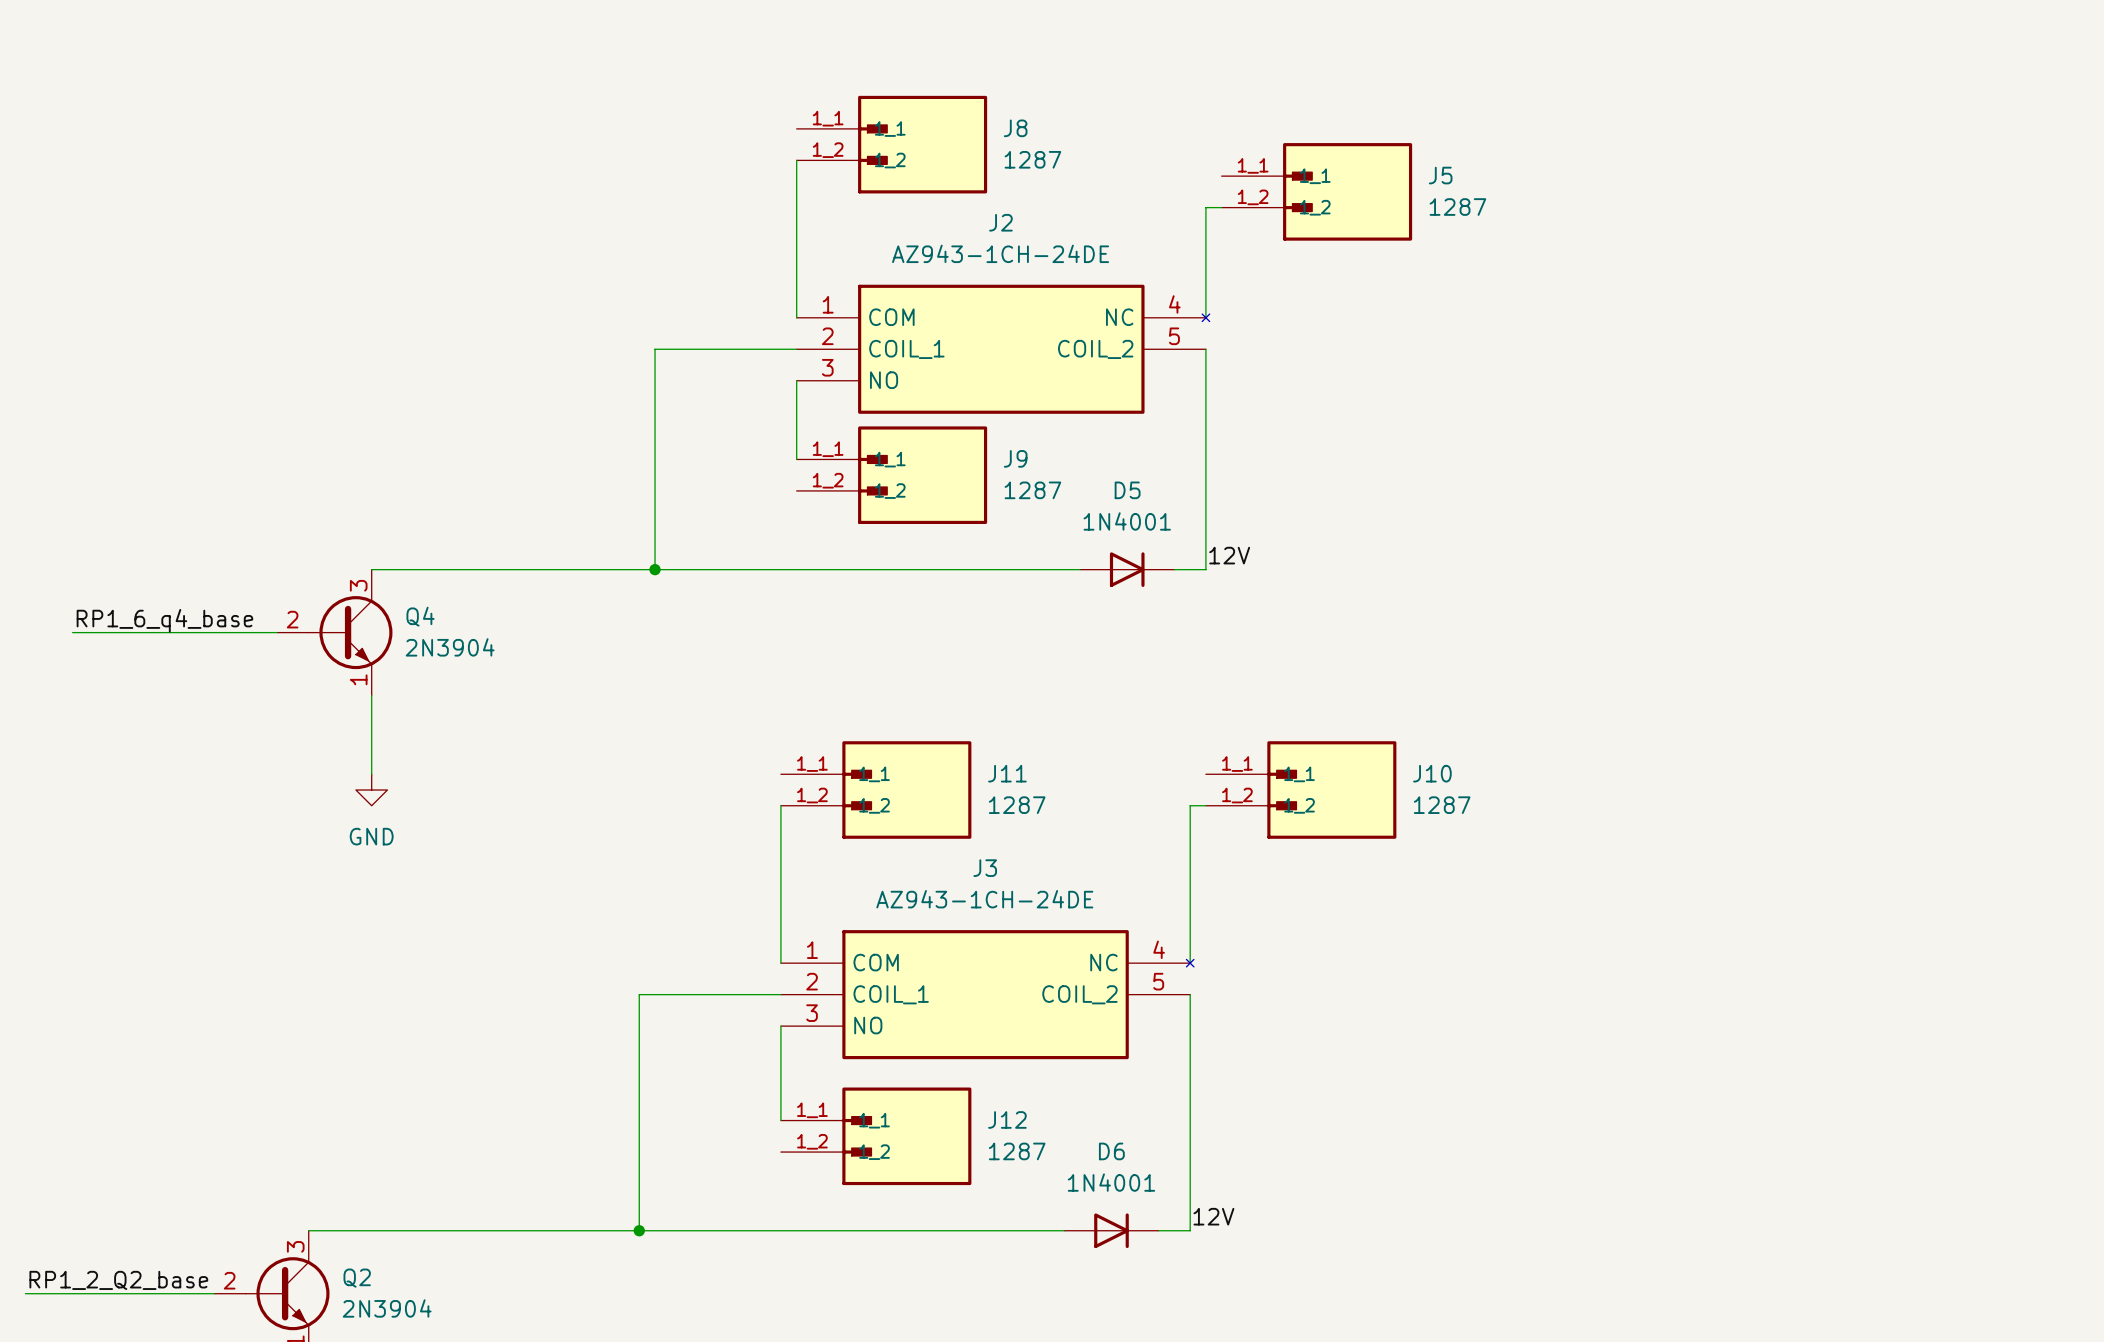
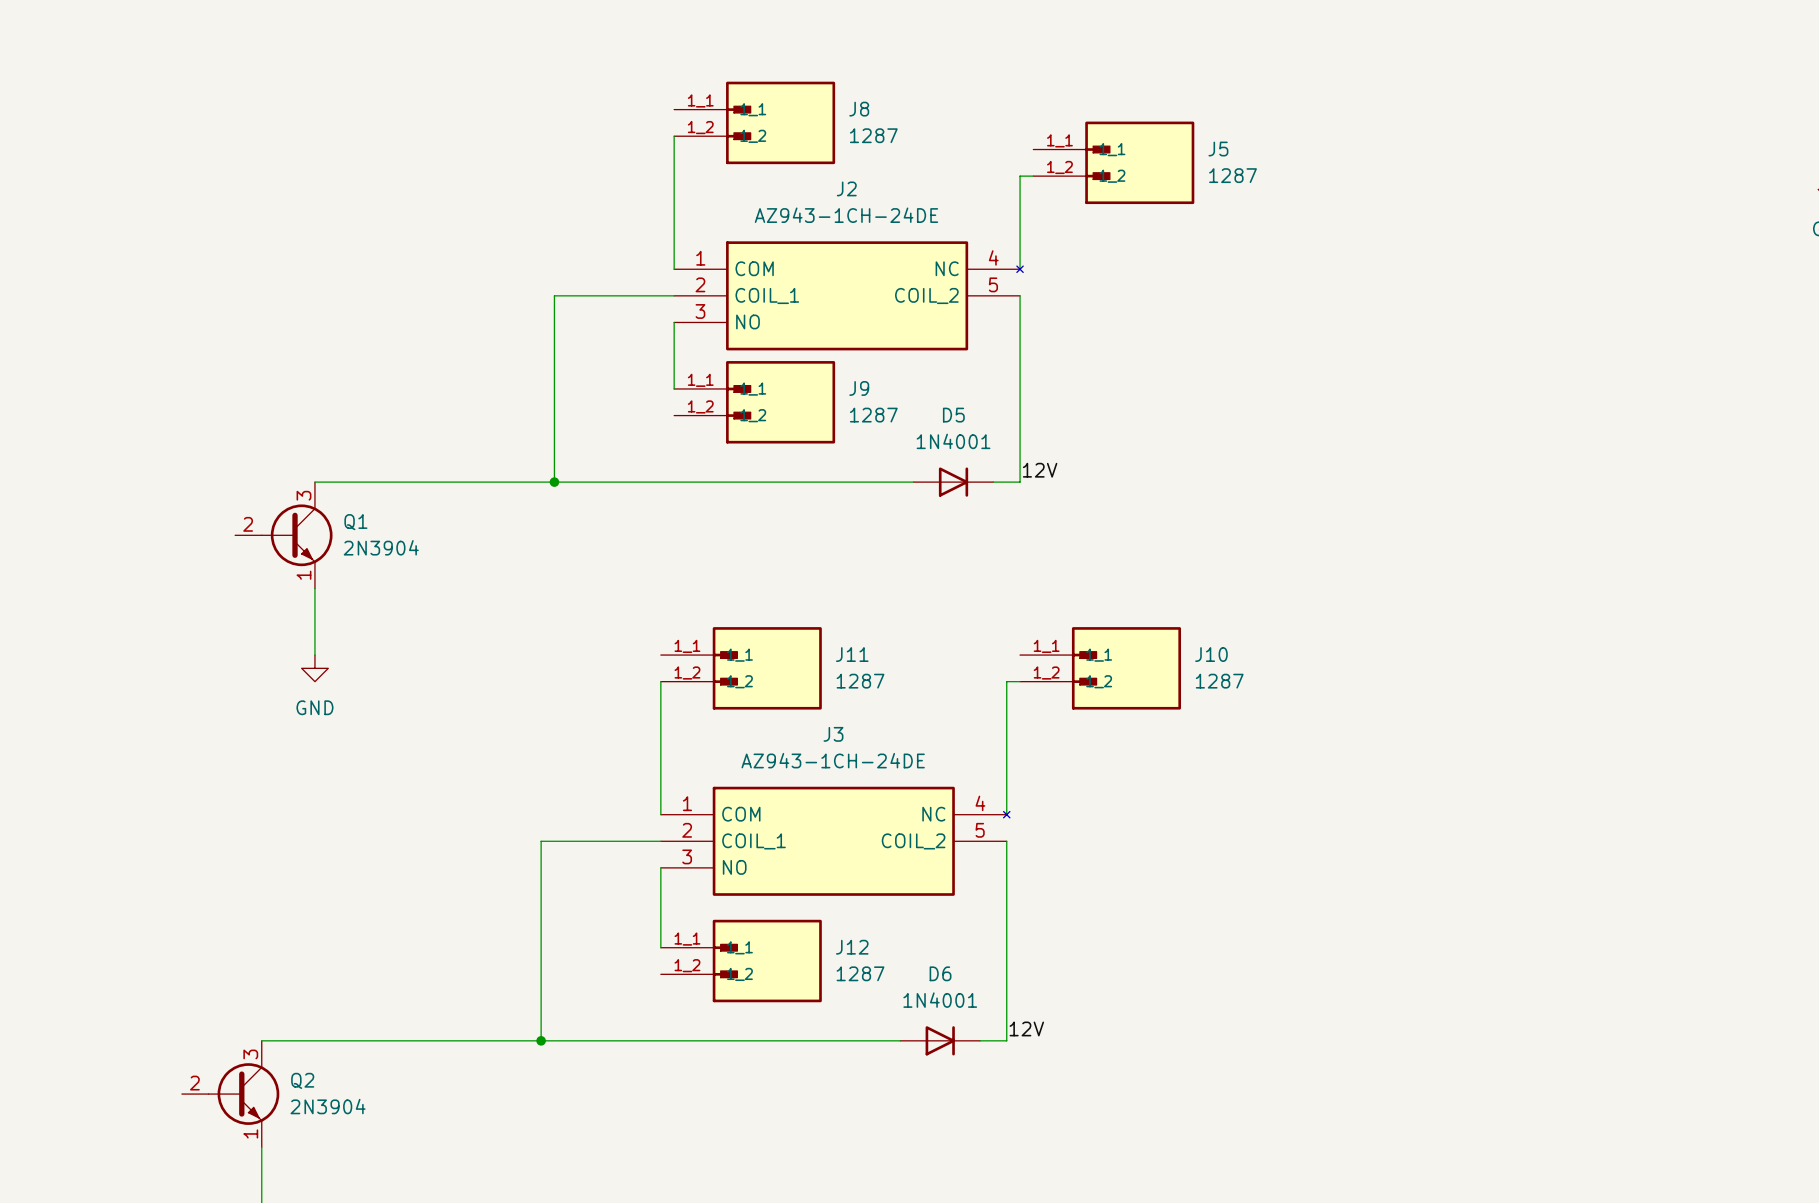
Q4 name: Q4 (420, 616) -> Q1 (355, 522)
label: RP1_6_q4_base (164, 620) -> none
wire: (72, 632) (277, 632) -> none
label: RP1_2_Q2_base (118, 1280) -> none
wire: (25, 1293) (214, 1293) -> none

